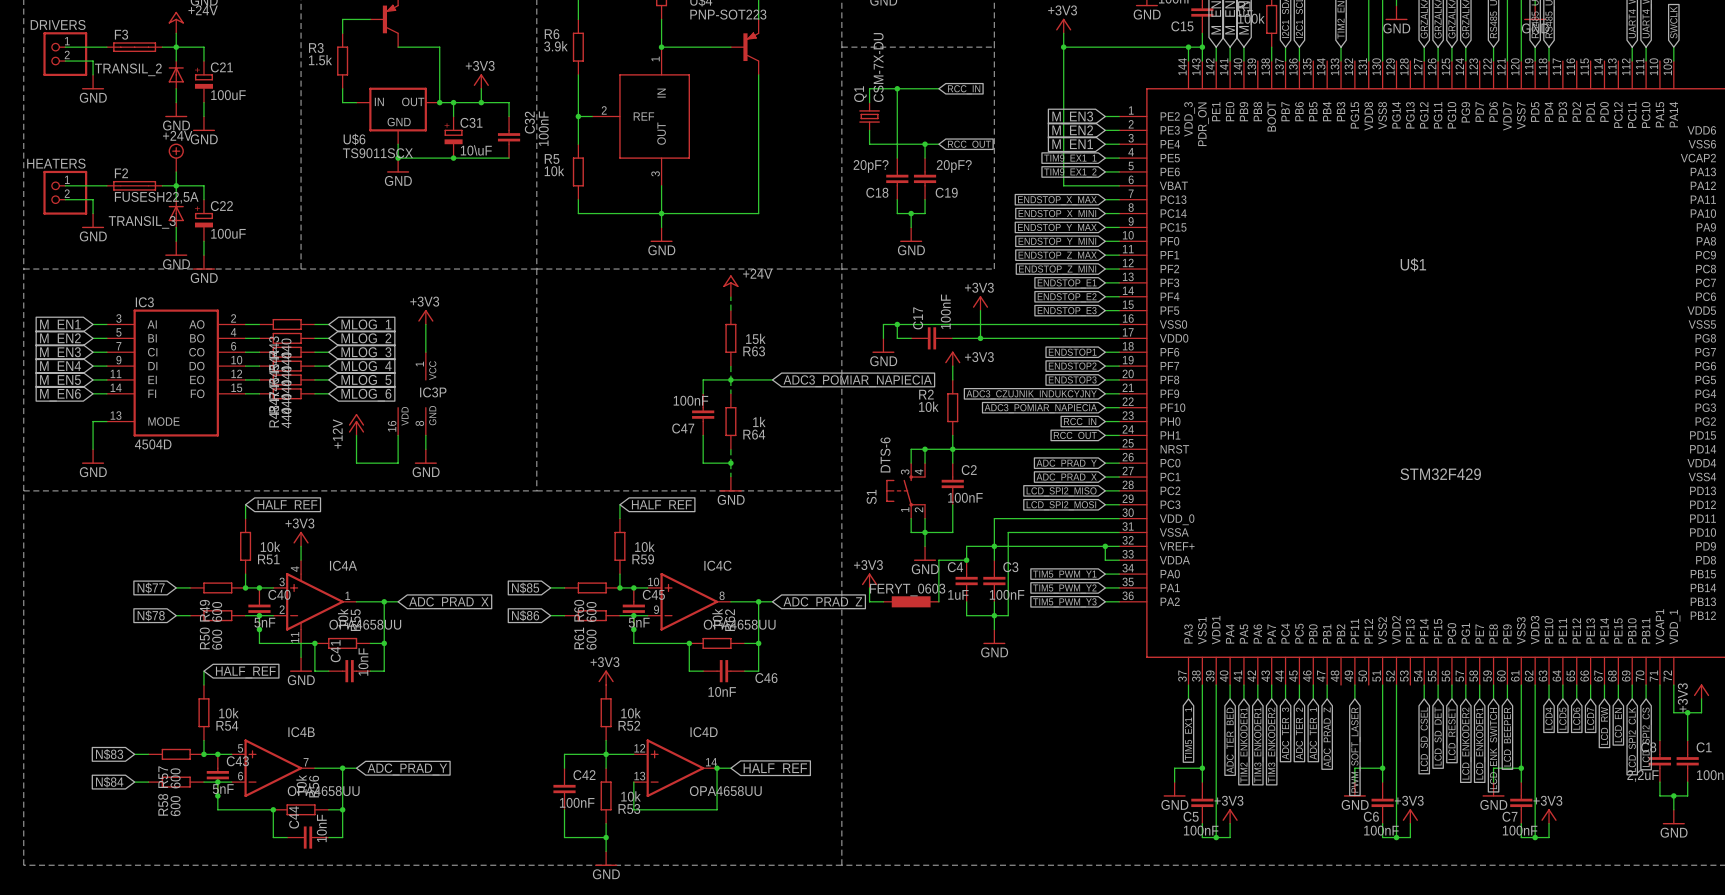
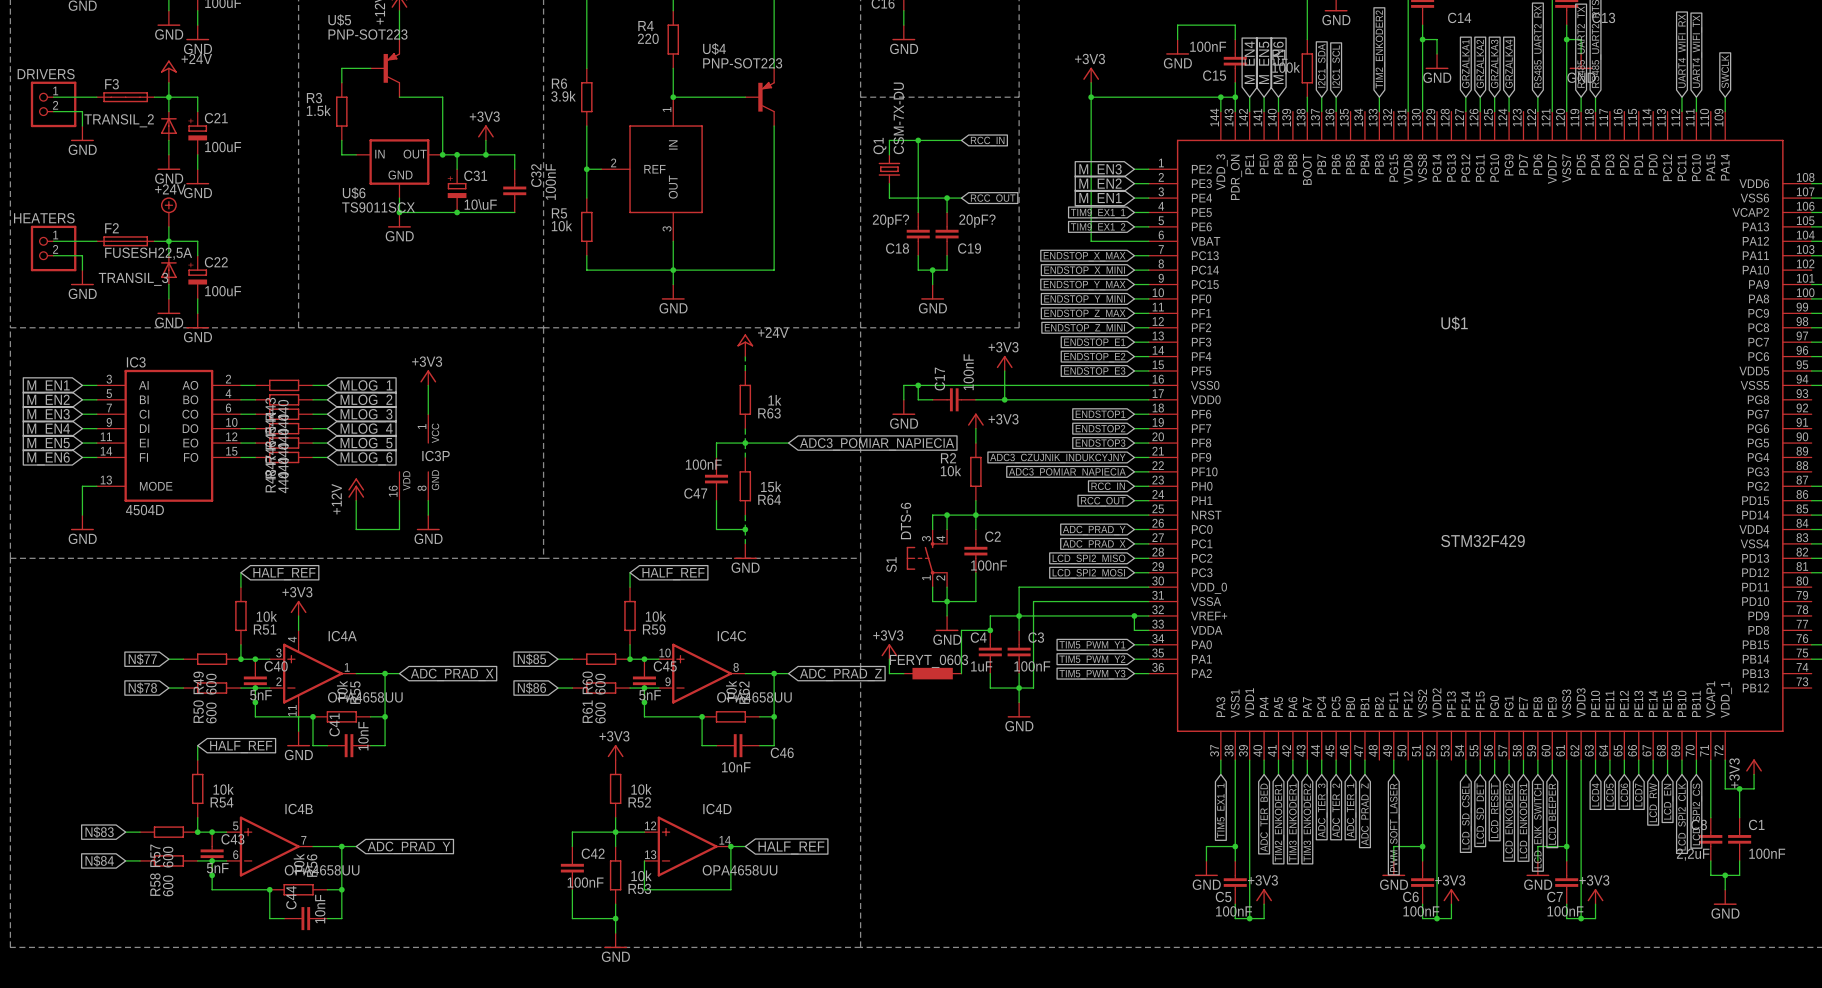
R63 value: 15k (755, 338) -> 1k (774, 400)
R64 value: 1k (759, 421) -> 15k (771, 486)

